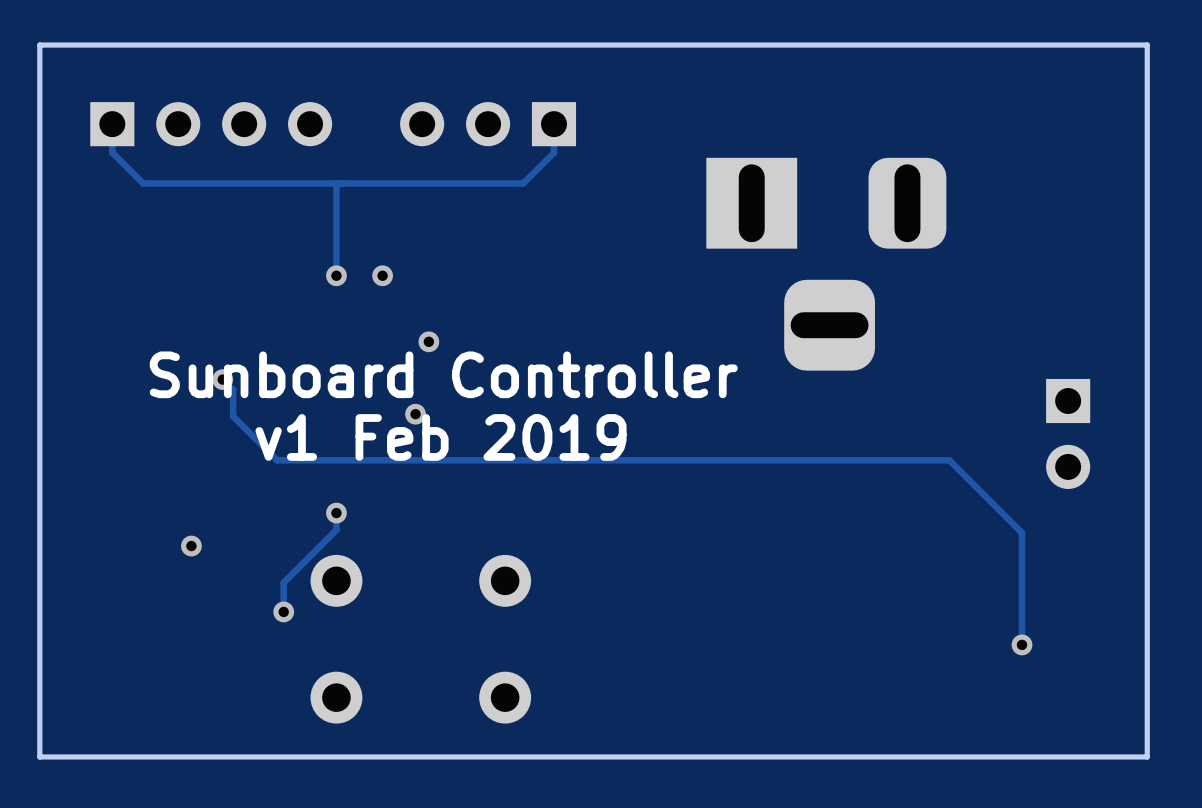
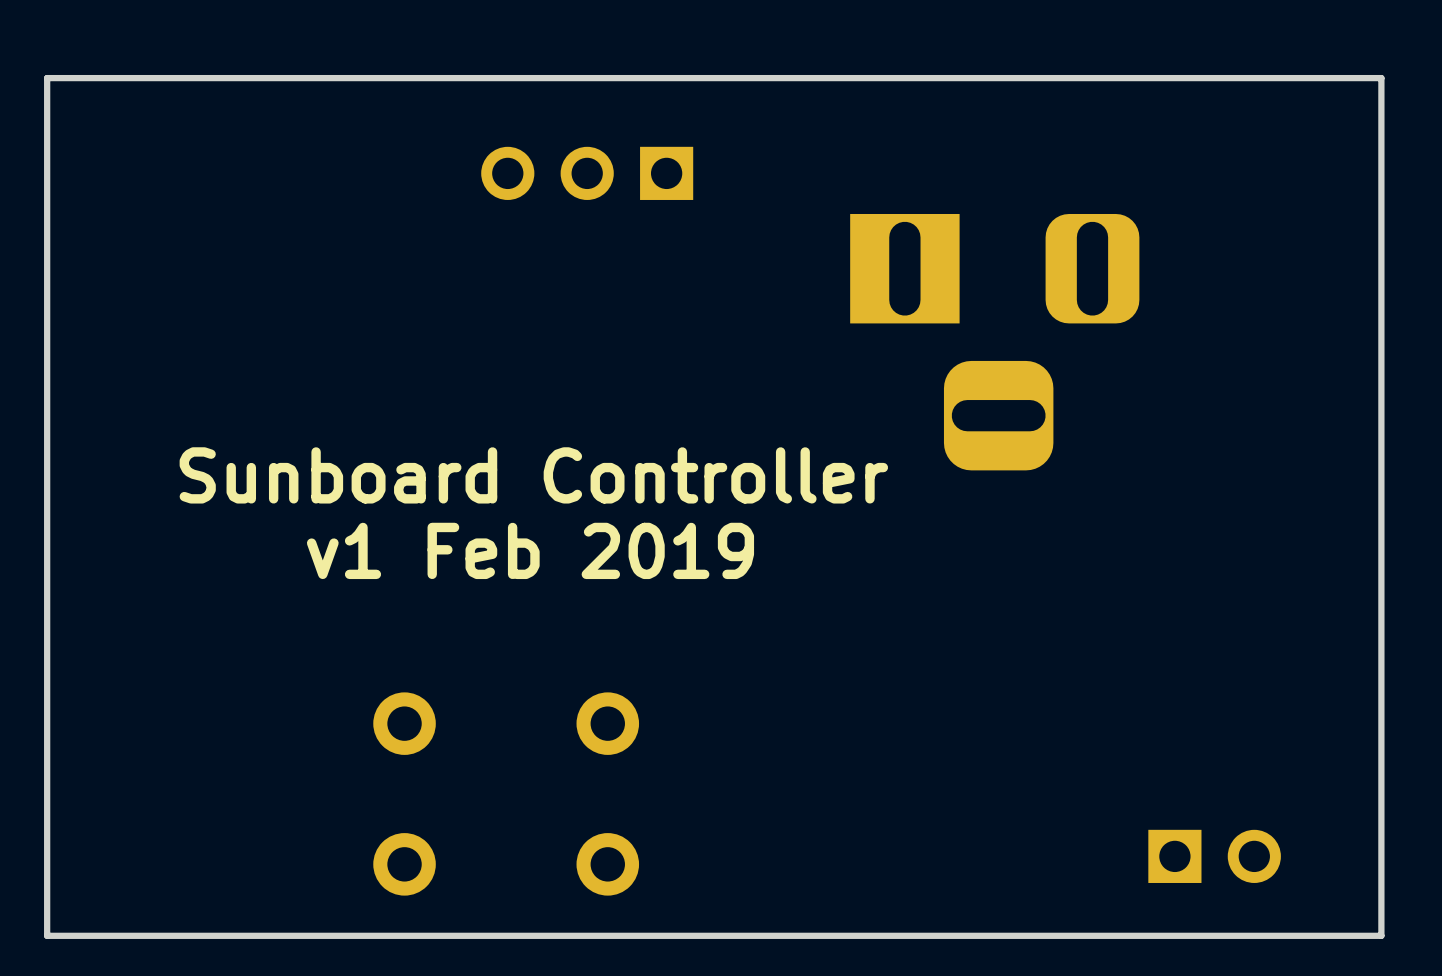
part: (211, 124) -> none
track: (553, 124) (553, 152) (523, 183) (143, 183) (112, 152) (112, 124) -> none
track: (336, 183) (336, 275) -> none
via: (336, 275) -> none
via: (382, 275) -> none
via: (428, 341) -> none
track: (222, 379) (233, 389) (233, 416) (277, 460) (949, 460) (1022, 532) (1022, 644) -> none
via: (222, 379) -> none
via: (415, 414) -> none
part rotation: 0° (1068, 433) -> 90° counterclockwise (1214, 856)
part position: (1068, 433) -> (1214, 856)
track: (336, 513) (336, 529) (283, 582) (283, 611) -> none
via: (336, 513) -> none
via: (191, 546) -> none
via: (283, 611) -> none
via: (1022, 644) -> none

